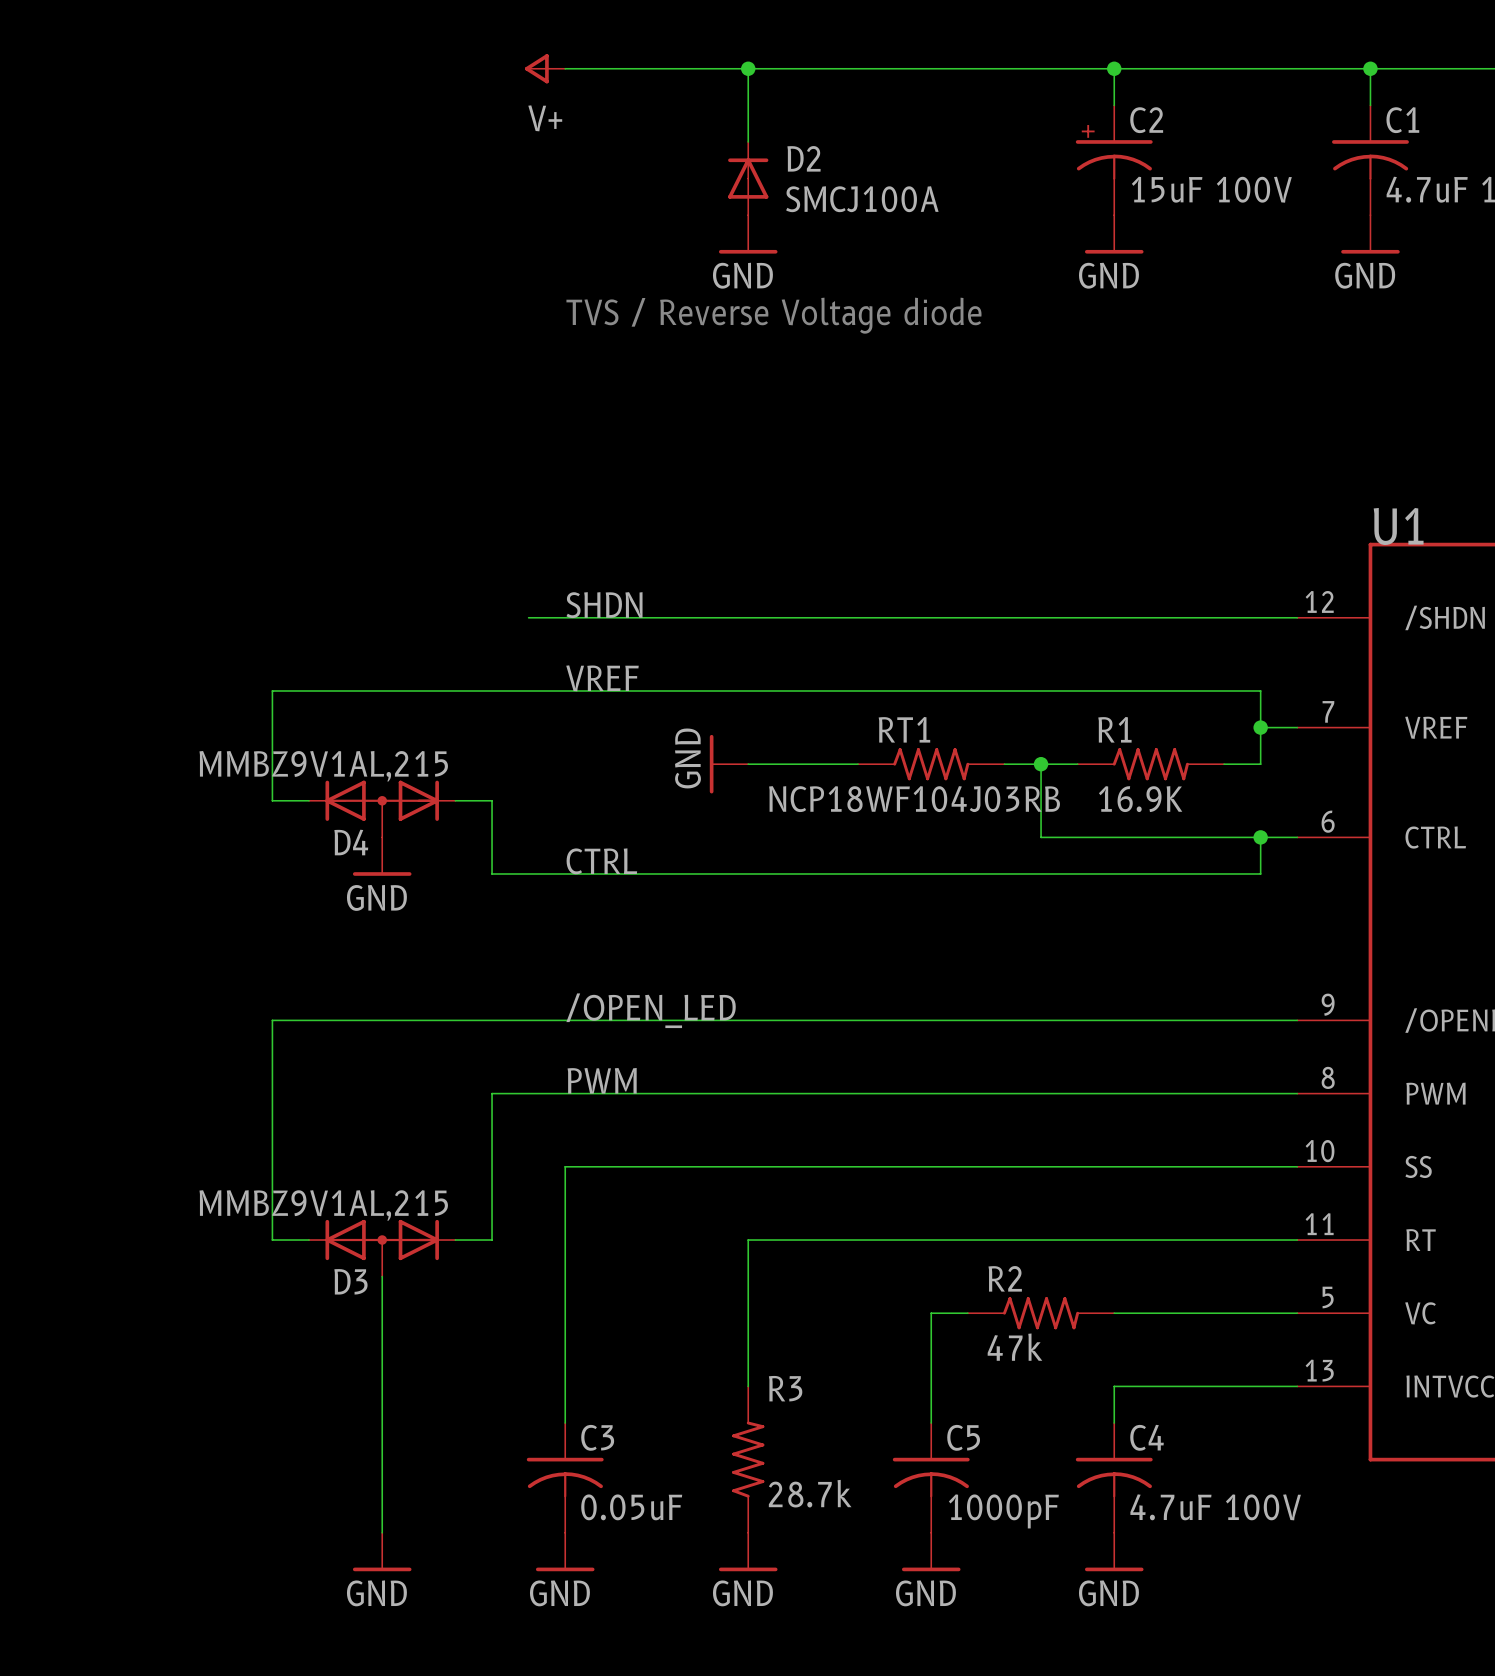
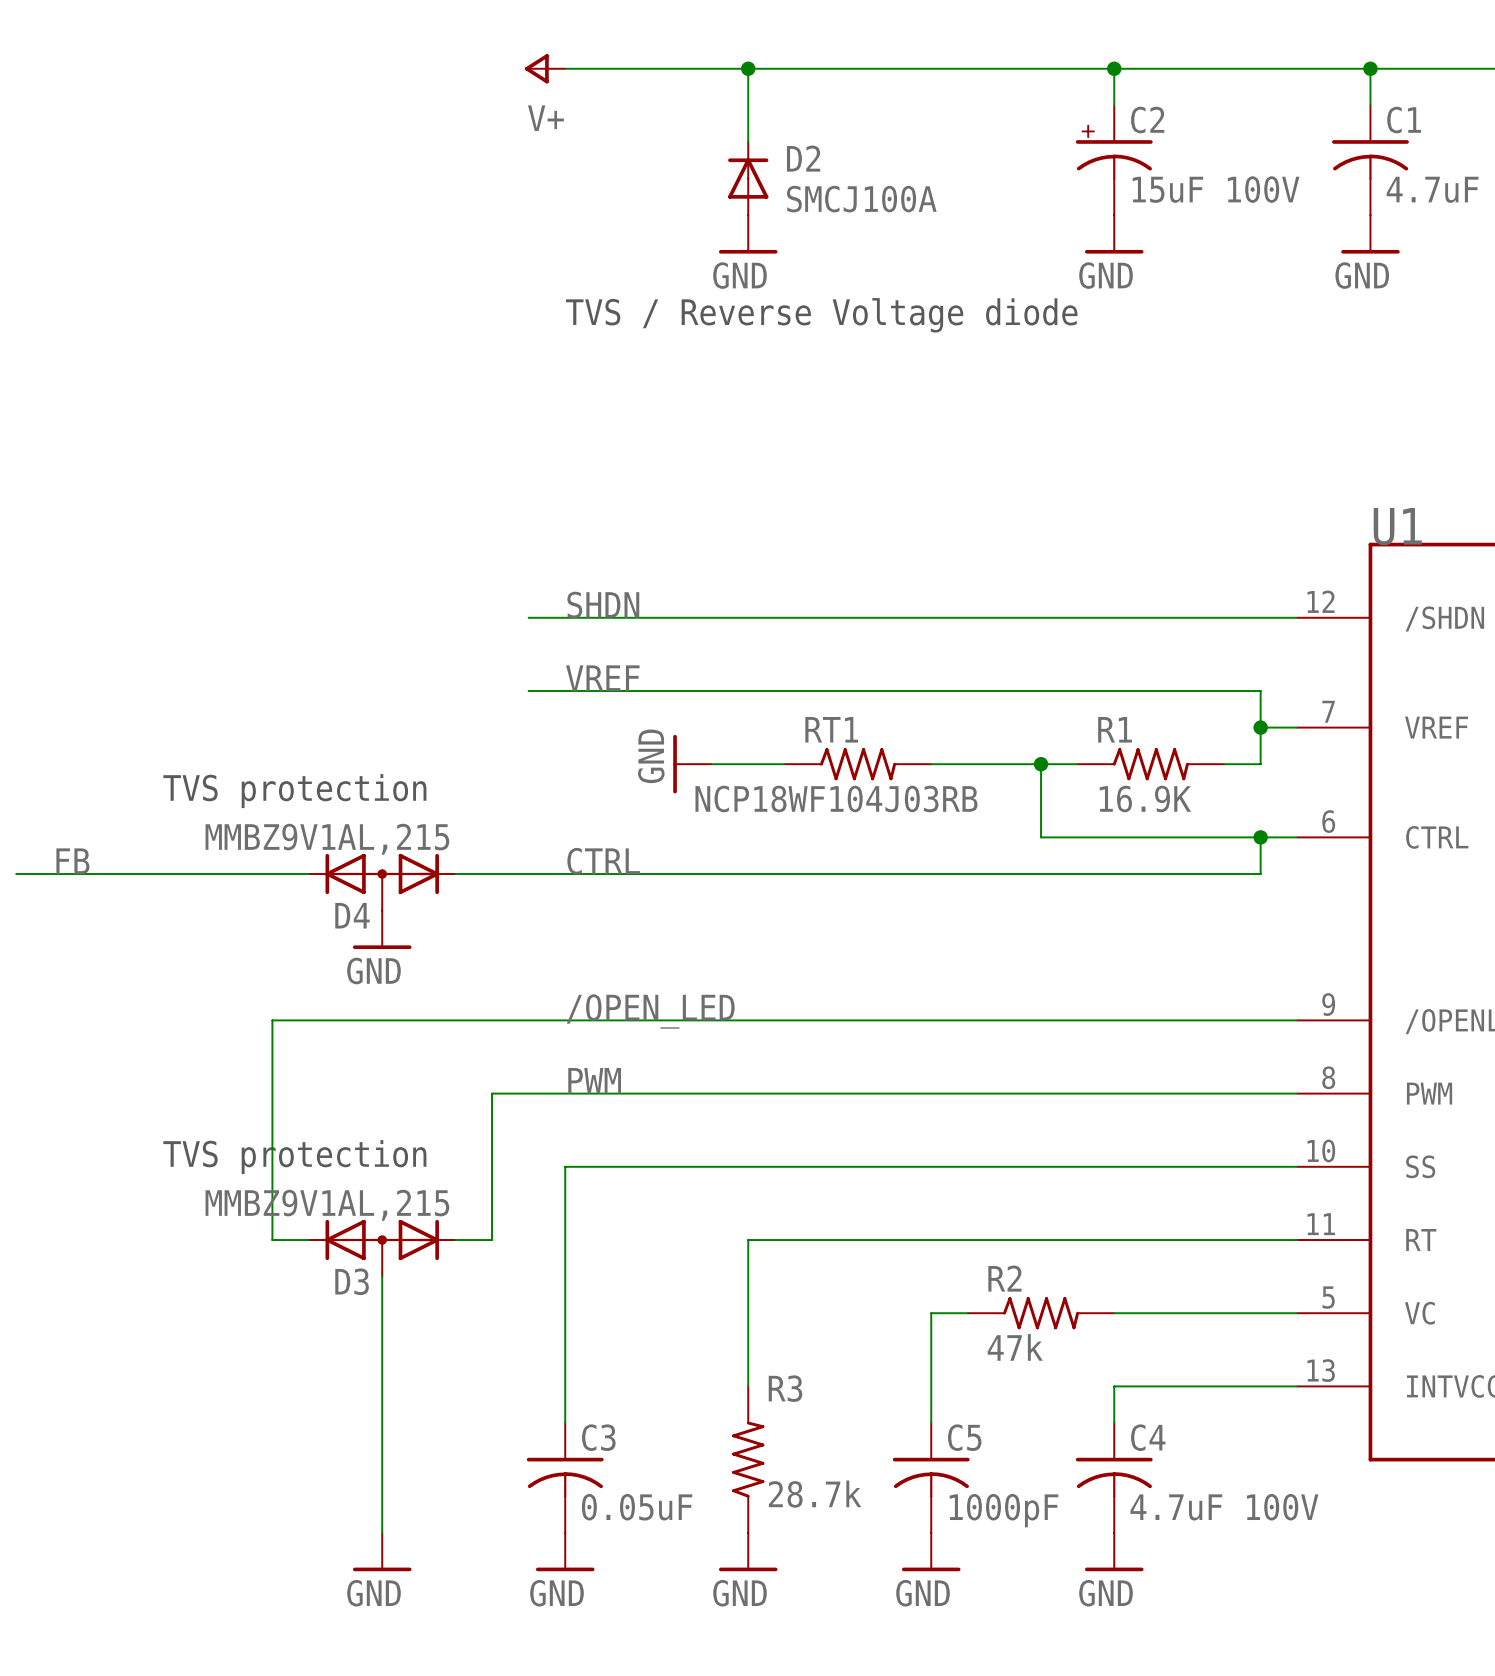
wire: (528, 690) (272, 690) (272, 800) (309, 800) -> none
power symbol position: GND (729, 764) -> GND (692, 764)
RT1 position: (931, 764) -> (858, 764)
text: none -> TVS protection (294, 791)
wire: (455, 800) (492, 800) (492, 873) -> (455, 873) (492, 873)
D4 position: (382, 809) -> (382, 882)
power symbol position: GND (382, 856) -> GND (382, 929)
label: none -> FB (72, 861)
wire: none -> (16, 873) (309, 873)
text: none -> TVS protection (294, 1157)

